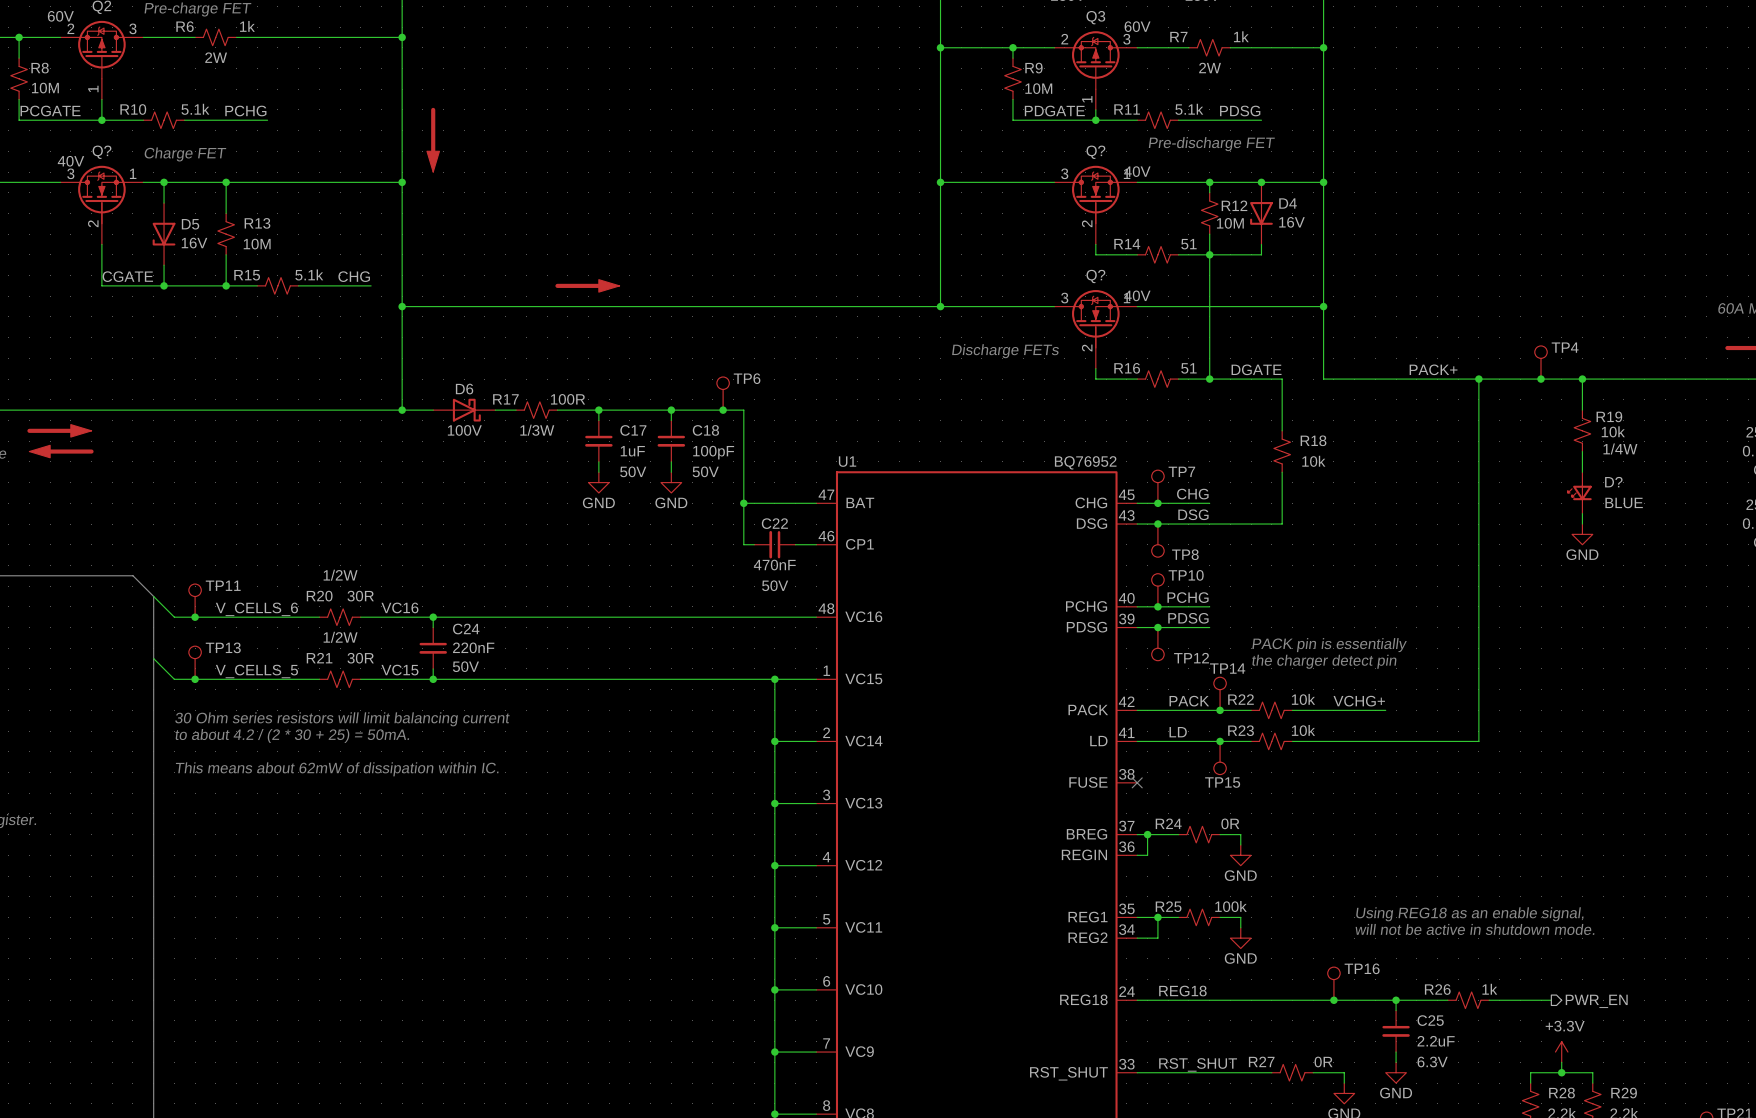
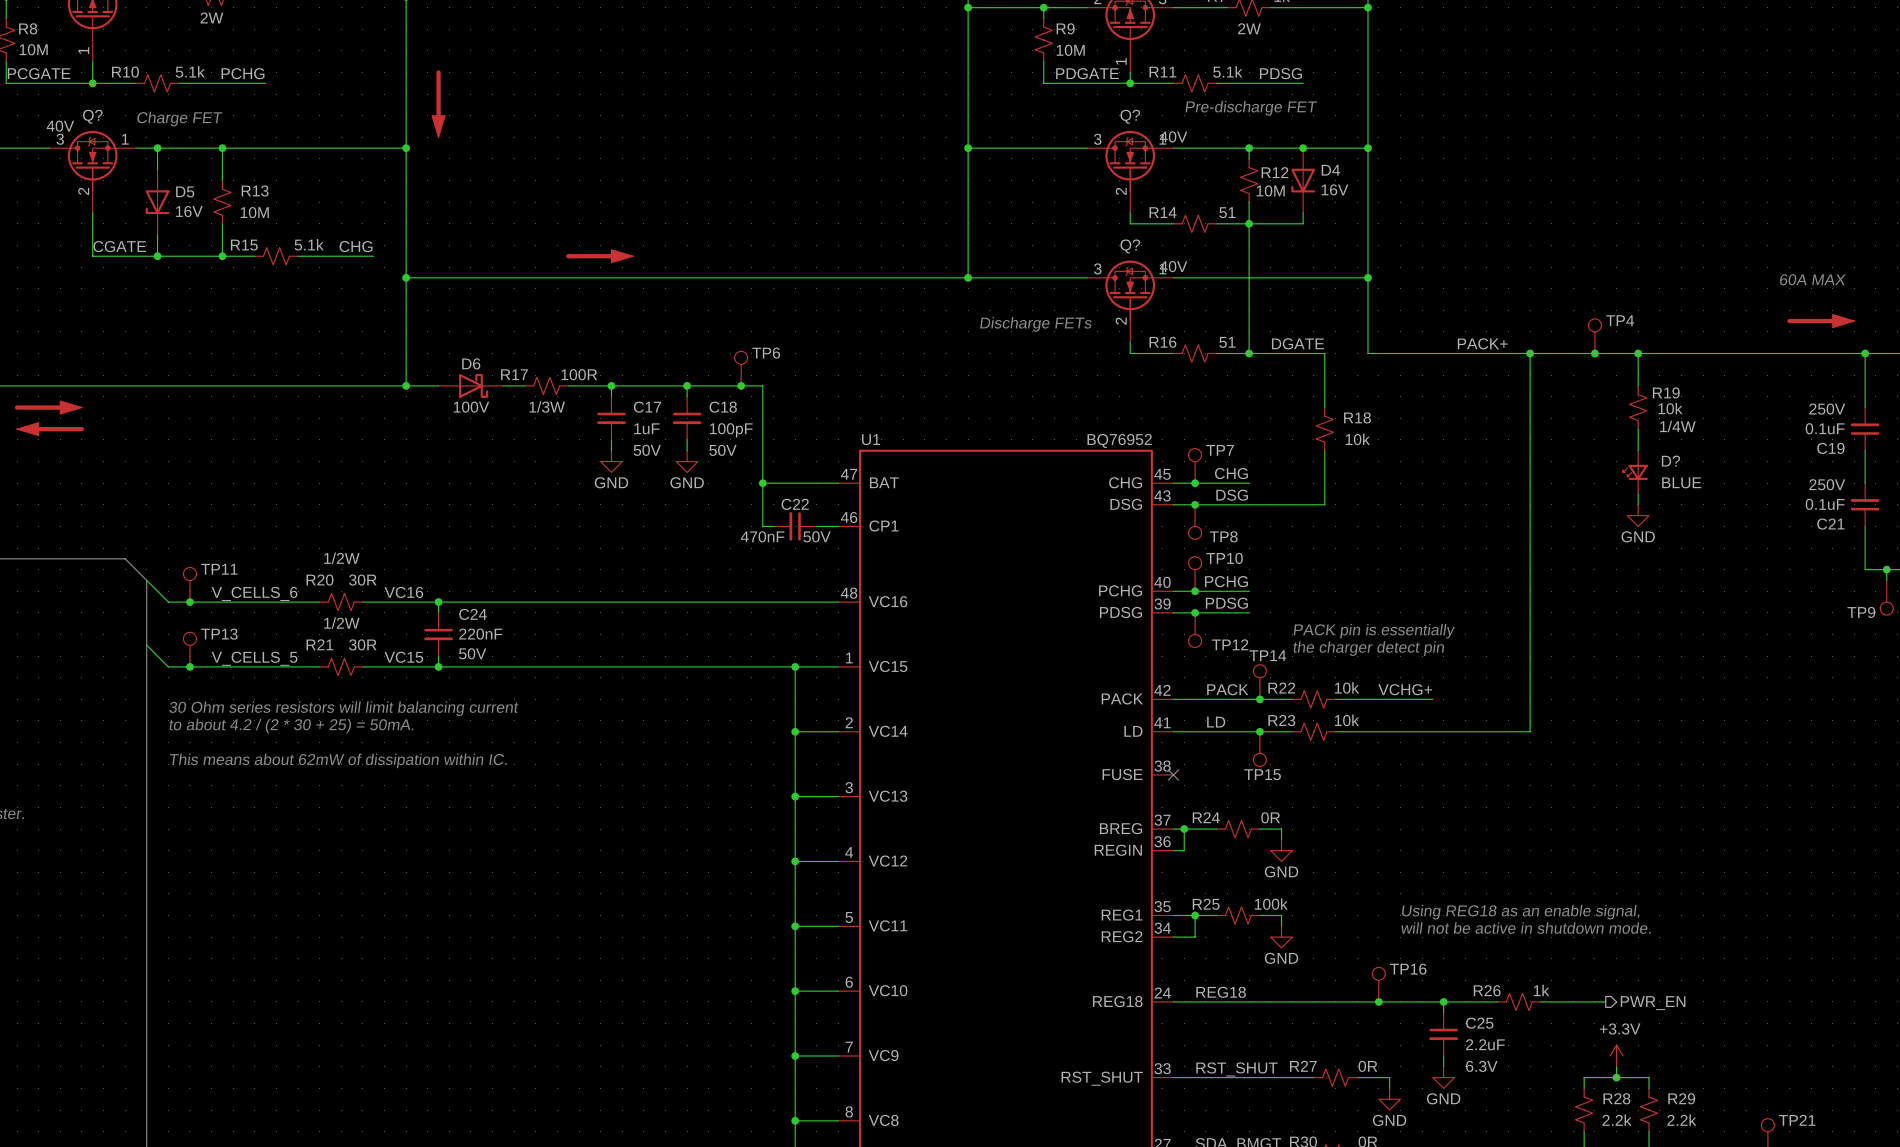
C22 value position: 470nF (774, 565) -> 470nF (762, 536)
C22 text position: 50V (775, 585) -> 50V (817, 536)

